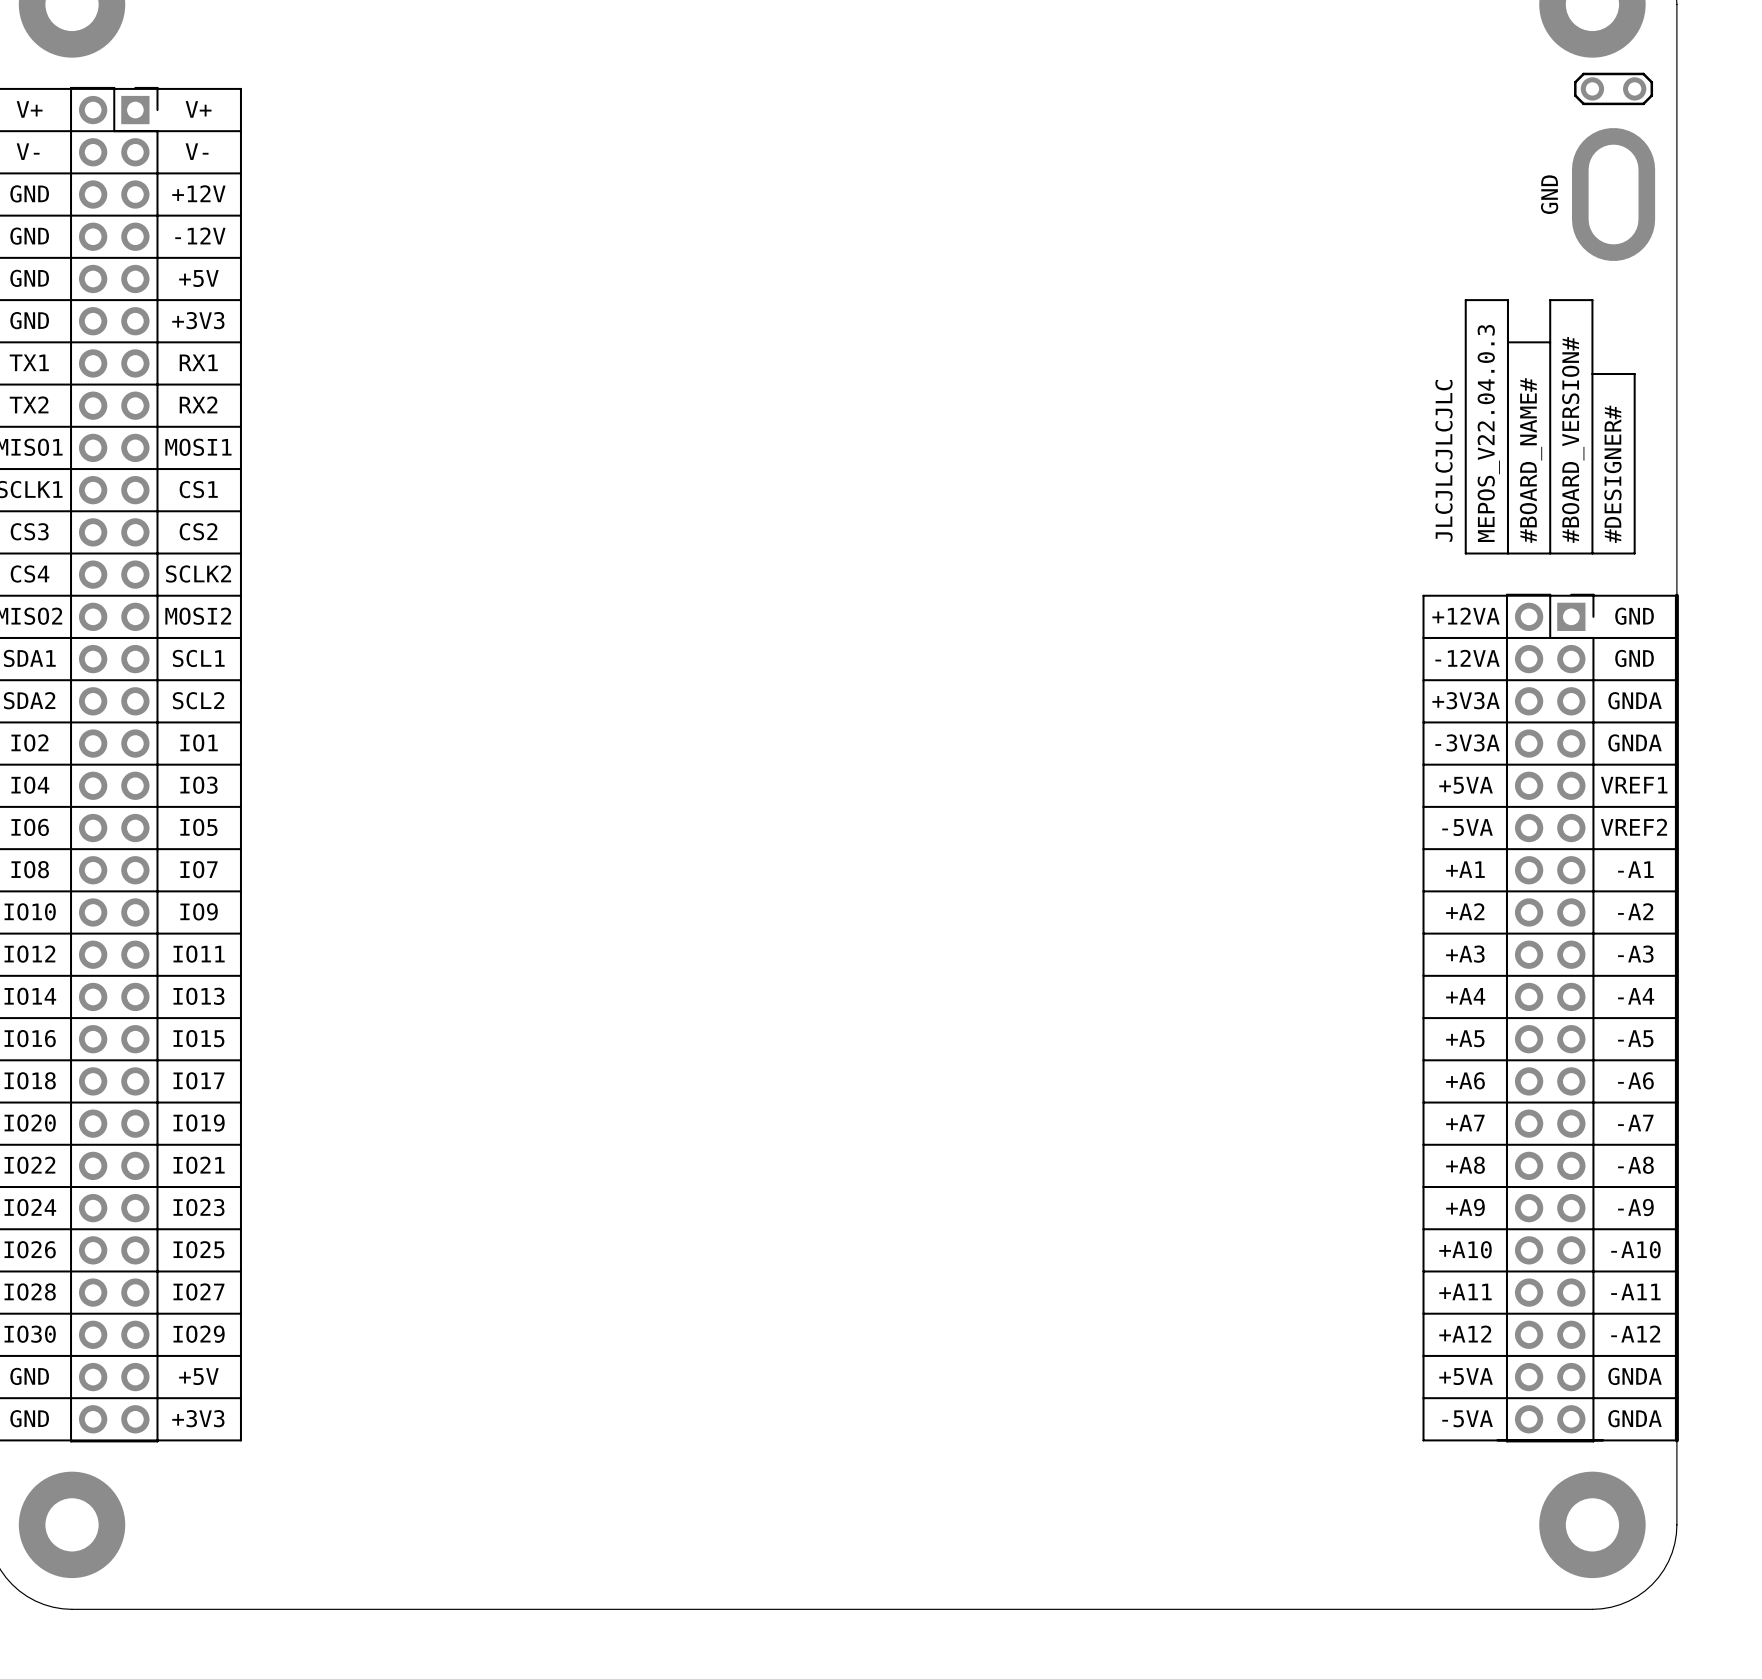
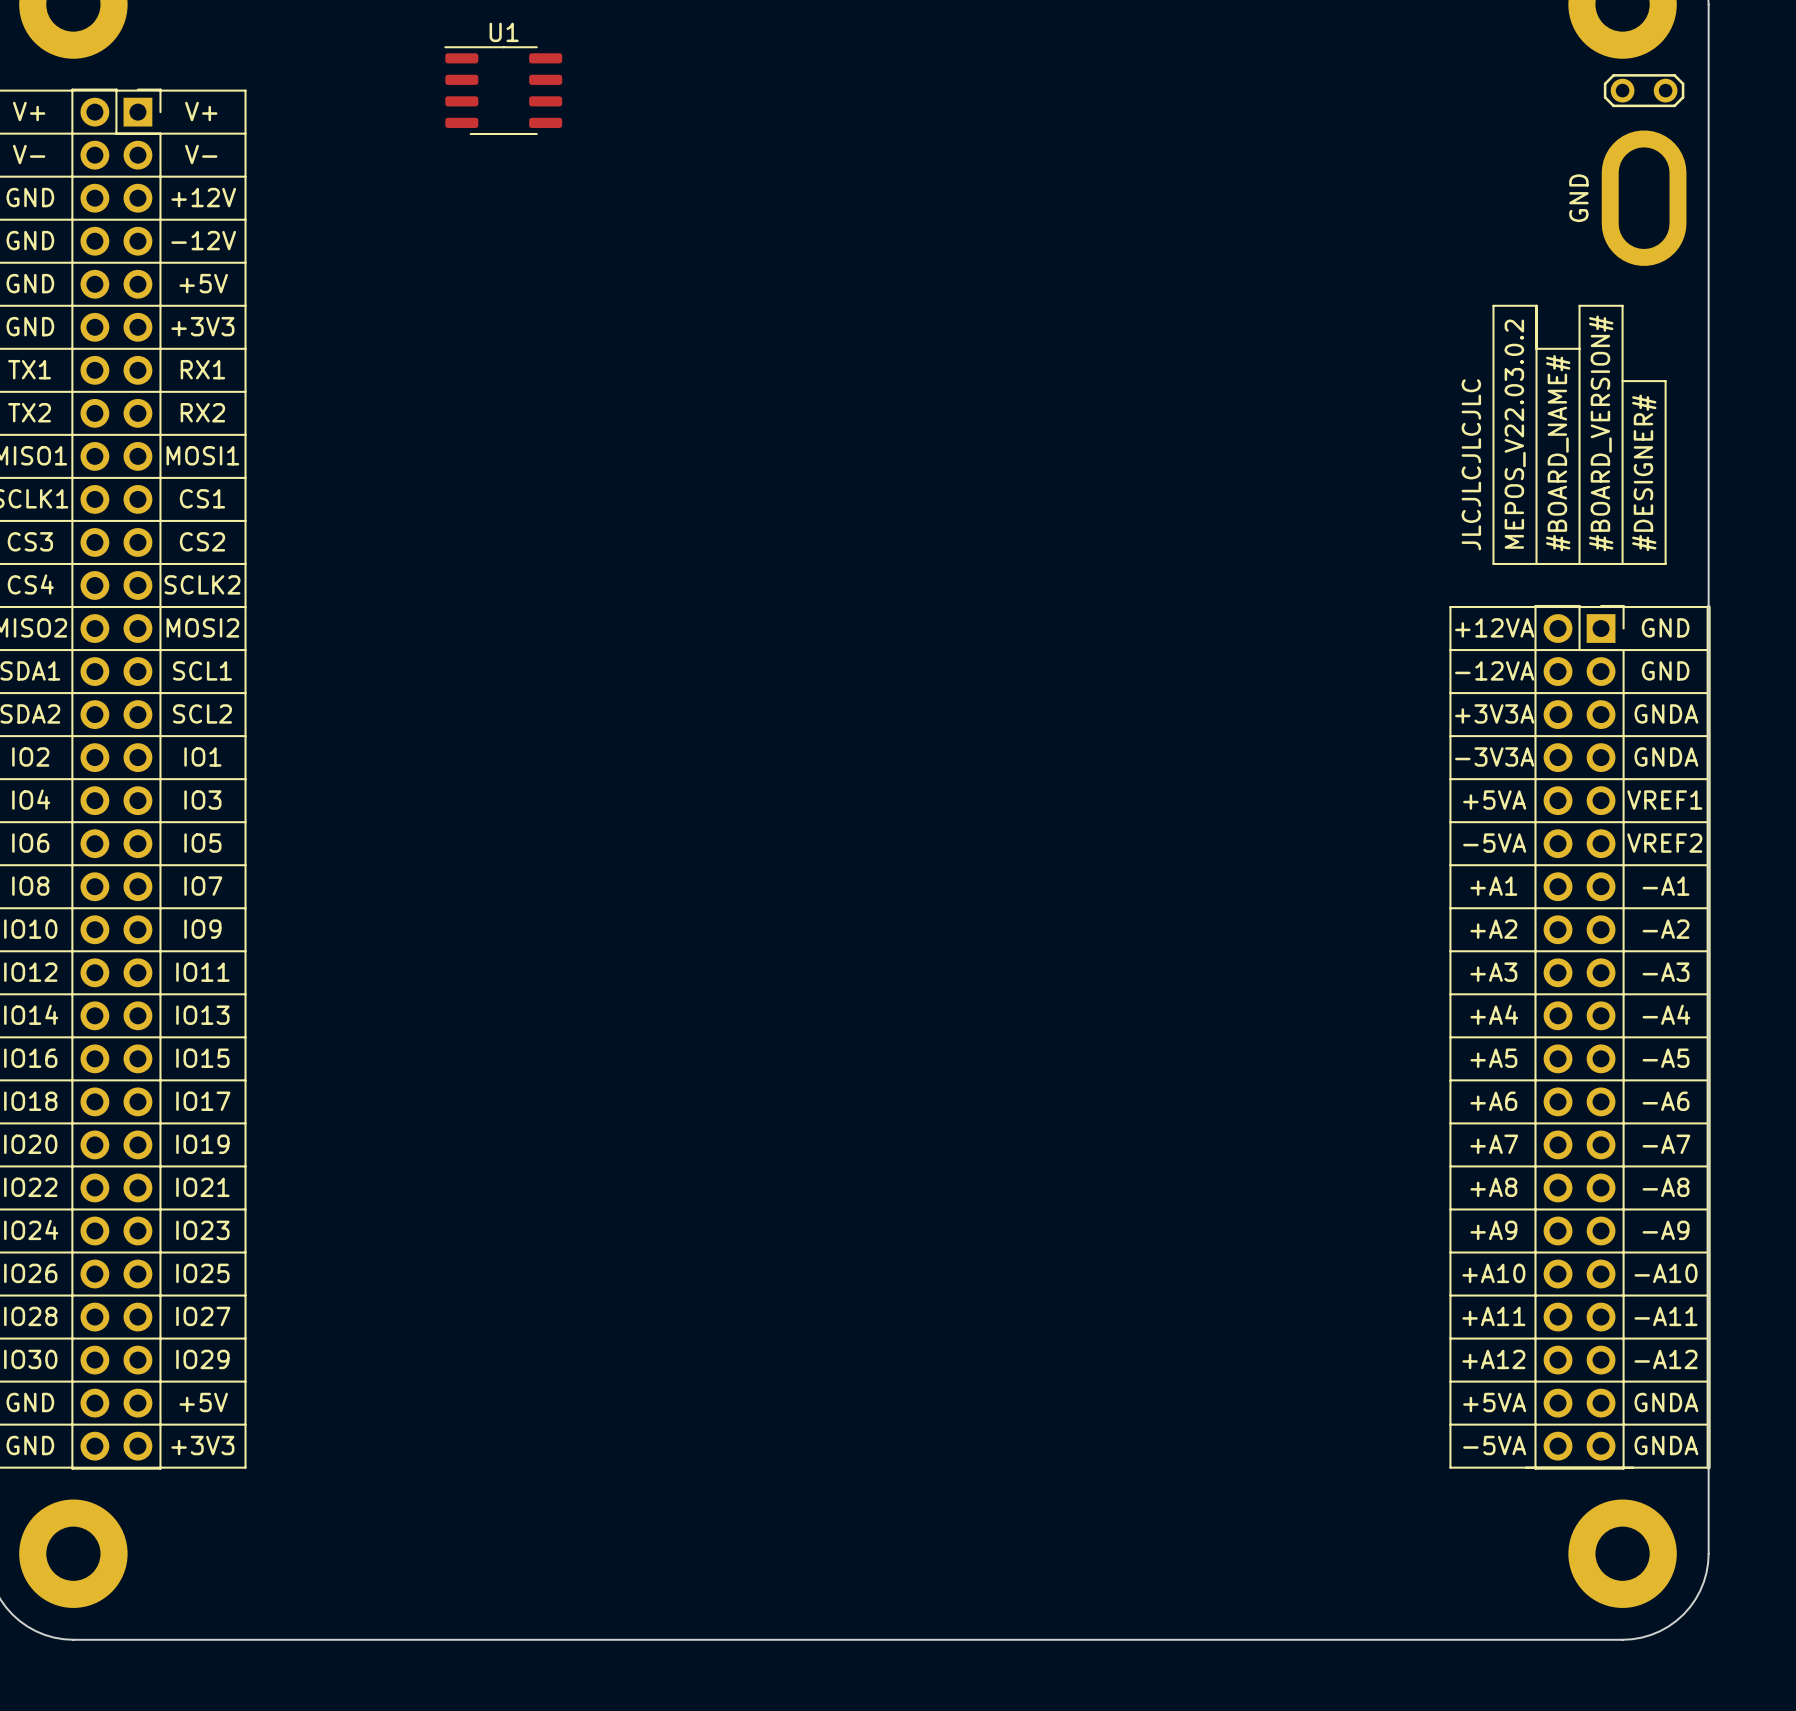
U1: none -> (503, 90)
text: MEPOS_V22.04.0.3 (1488, 433) -> MEPOS_V22.03.0.2 (1515, 434)

